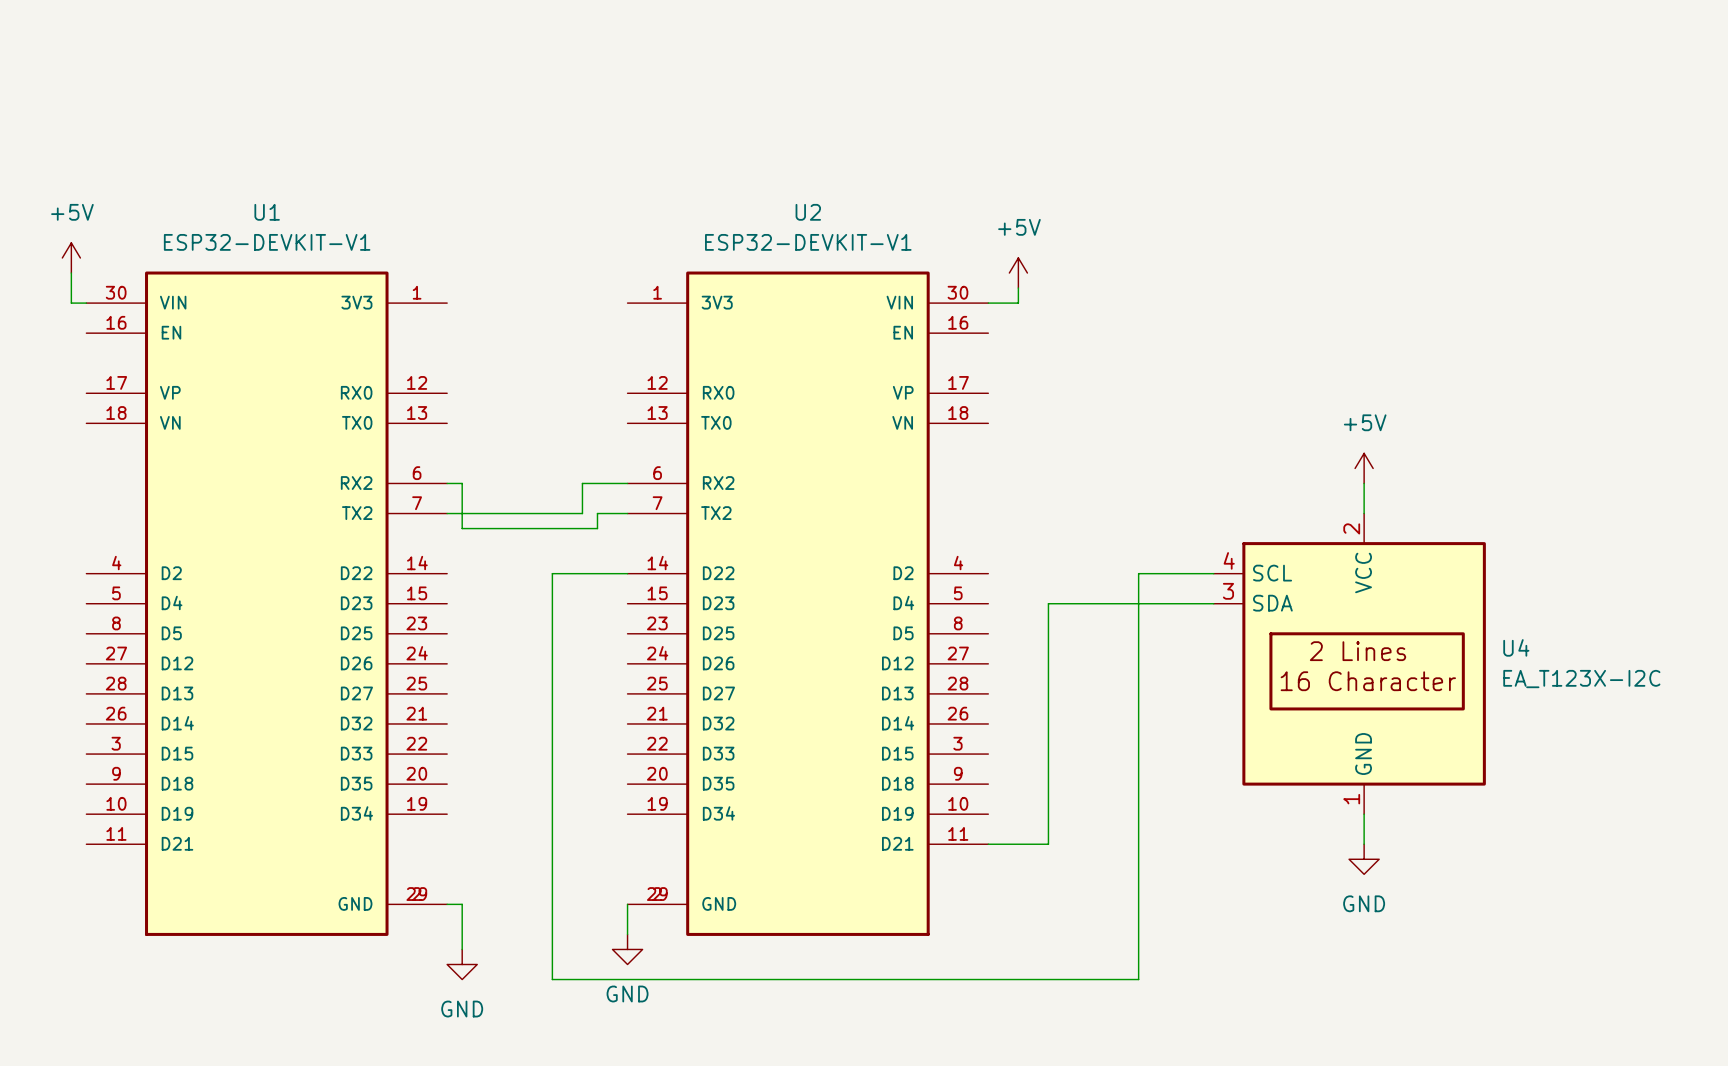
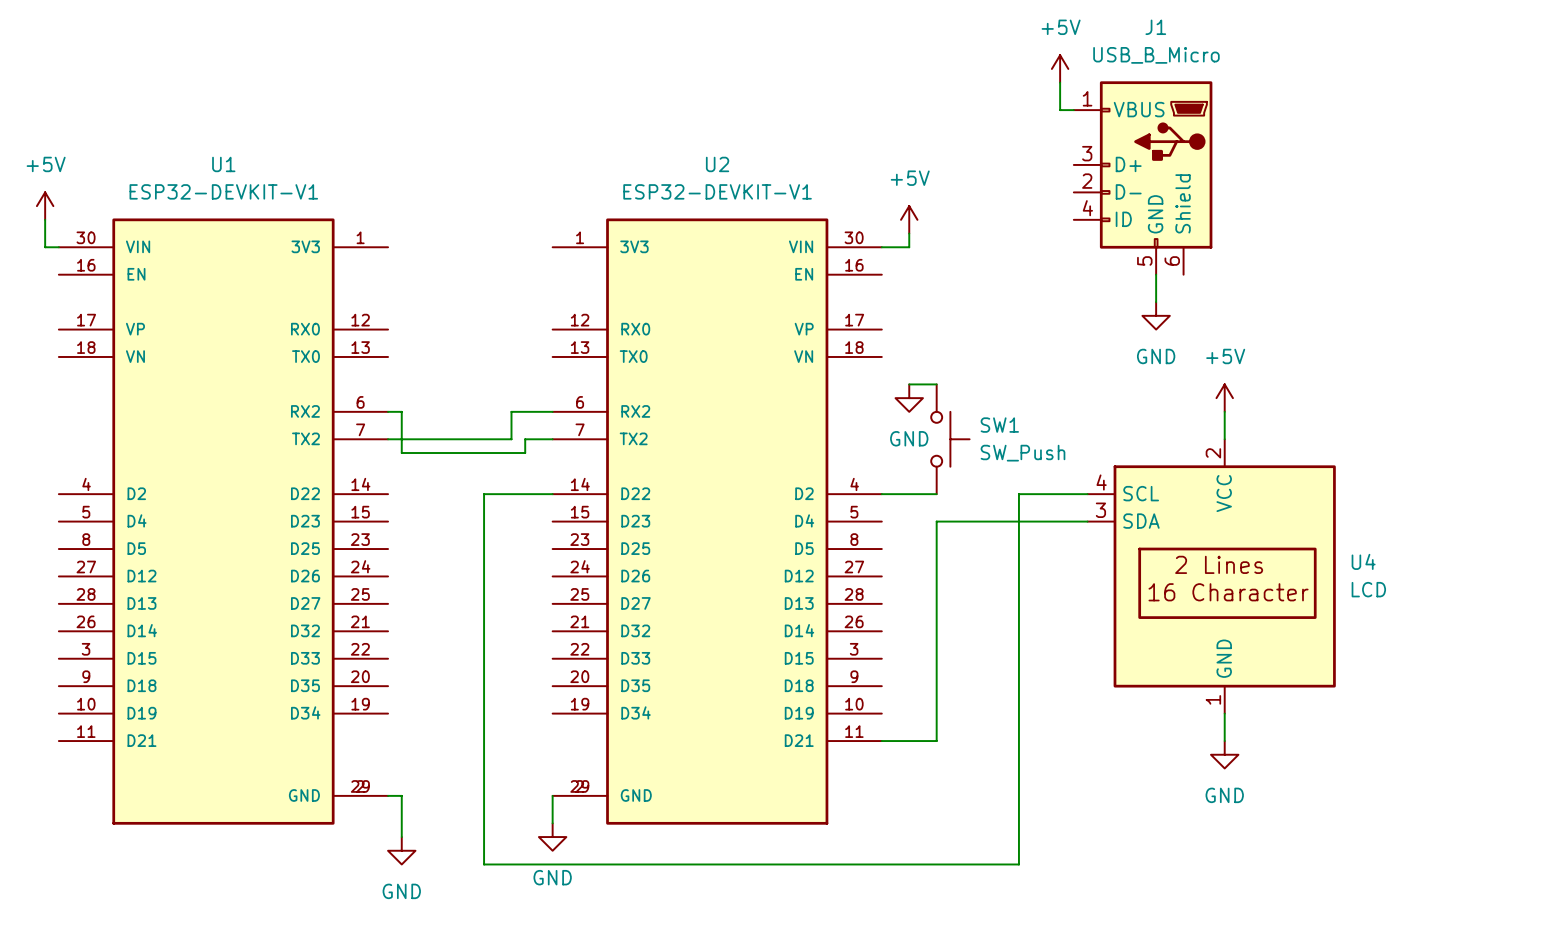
power symbol: none -> +5V (1060, 68)
wire: none -> (1060, 82) (1060, 110) (1073, 110)
J1: none -> USB_B_Micro (1143, 178)
wire: none -> (1156, 274) (1156, 302)
power symbol: none -> GND (1156, 315)
wire: none -> (909, 384) (936, 384)
power symbol: none -> GND (909, 398)
SW1: none -> SW_Push (950, 439)
wire: none -> (881, 494) (936, 494)
U4 value: EA_T123X-I2C (1581, 679) -> LCD (1368, 589)

